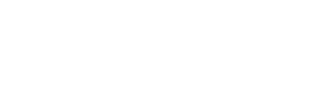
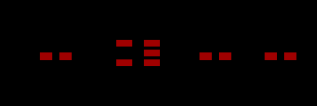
part: none -> (138, 52)
part: none -> (55, 56)
part: none -> (215, 56)
part: none -> (280, 56)

